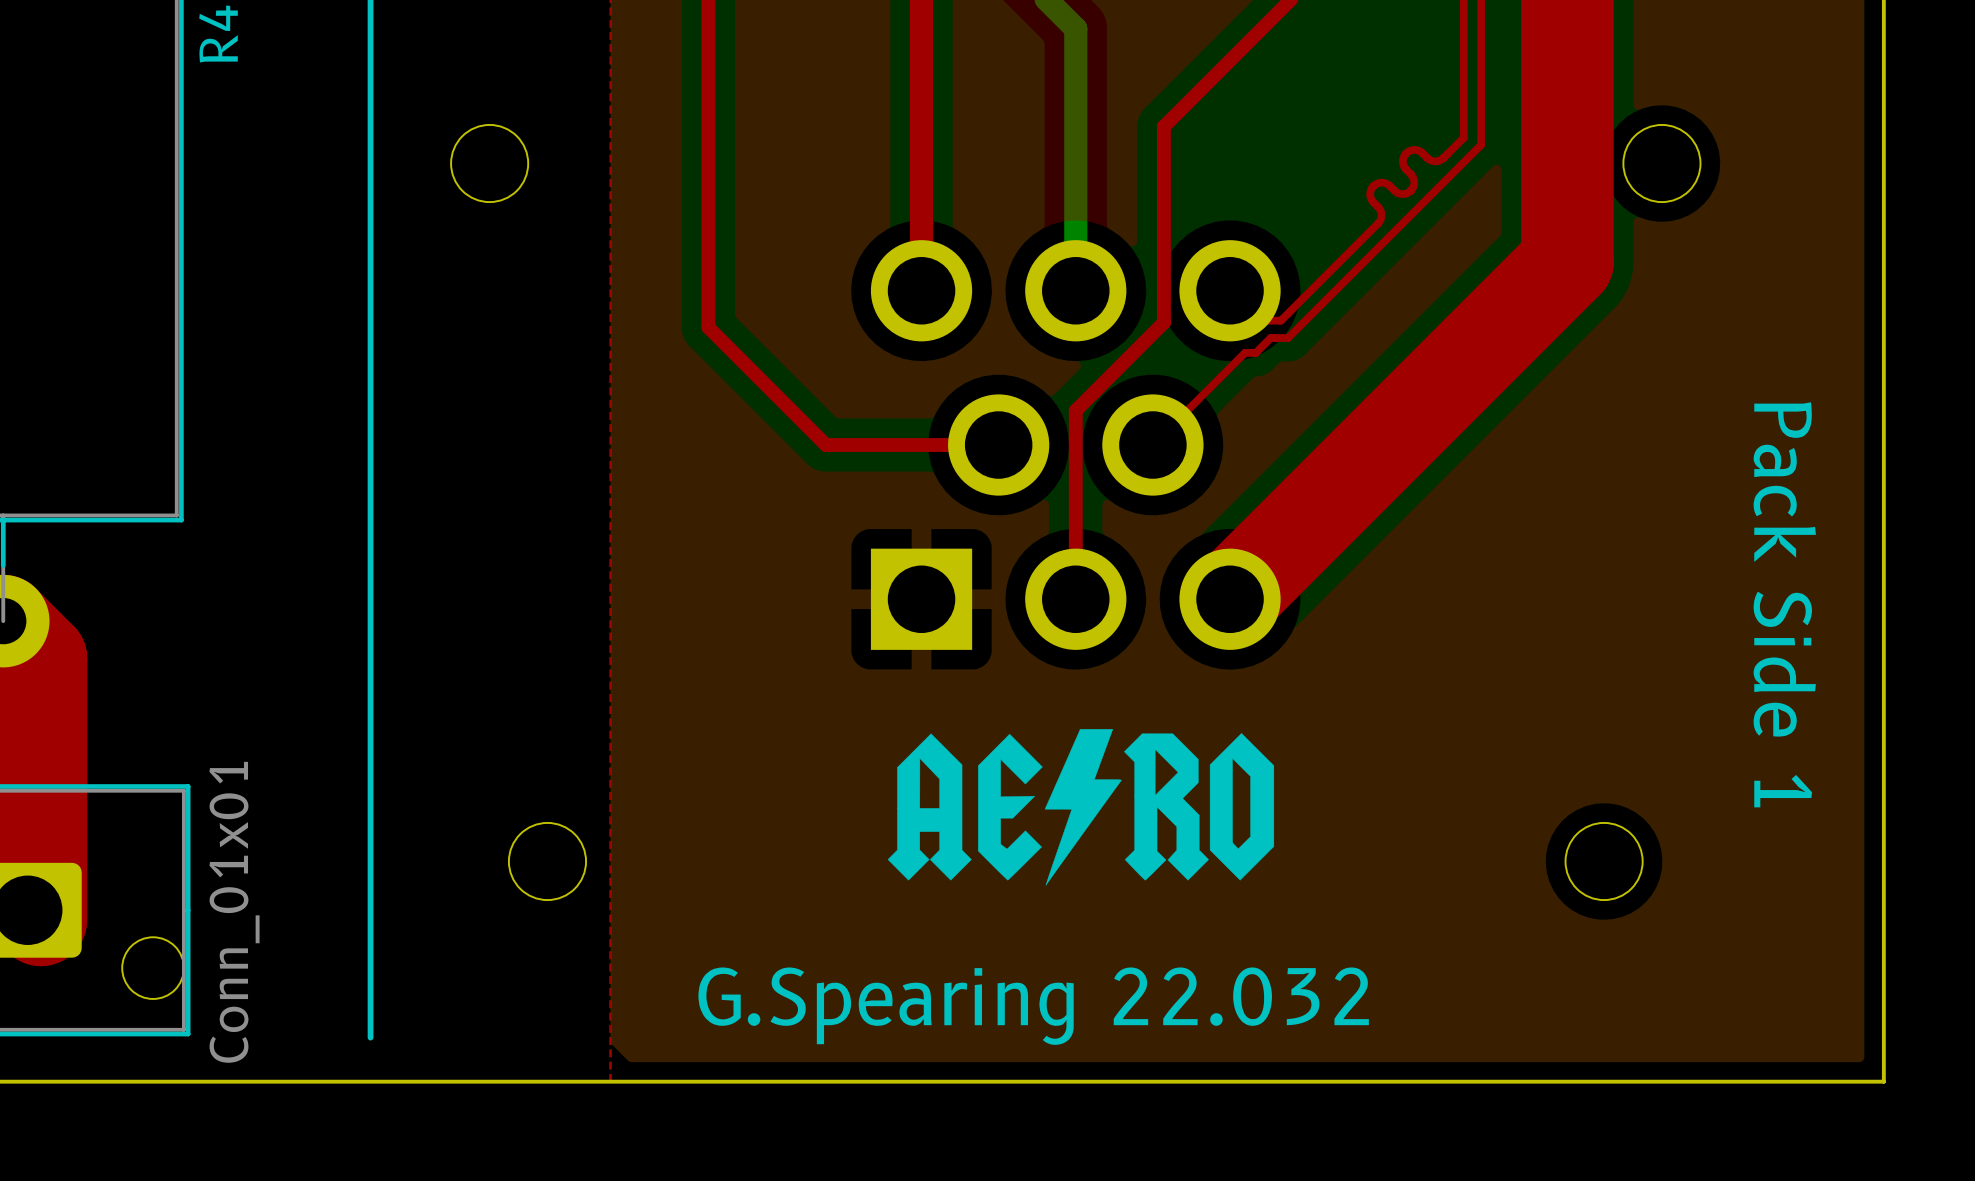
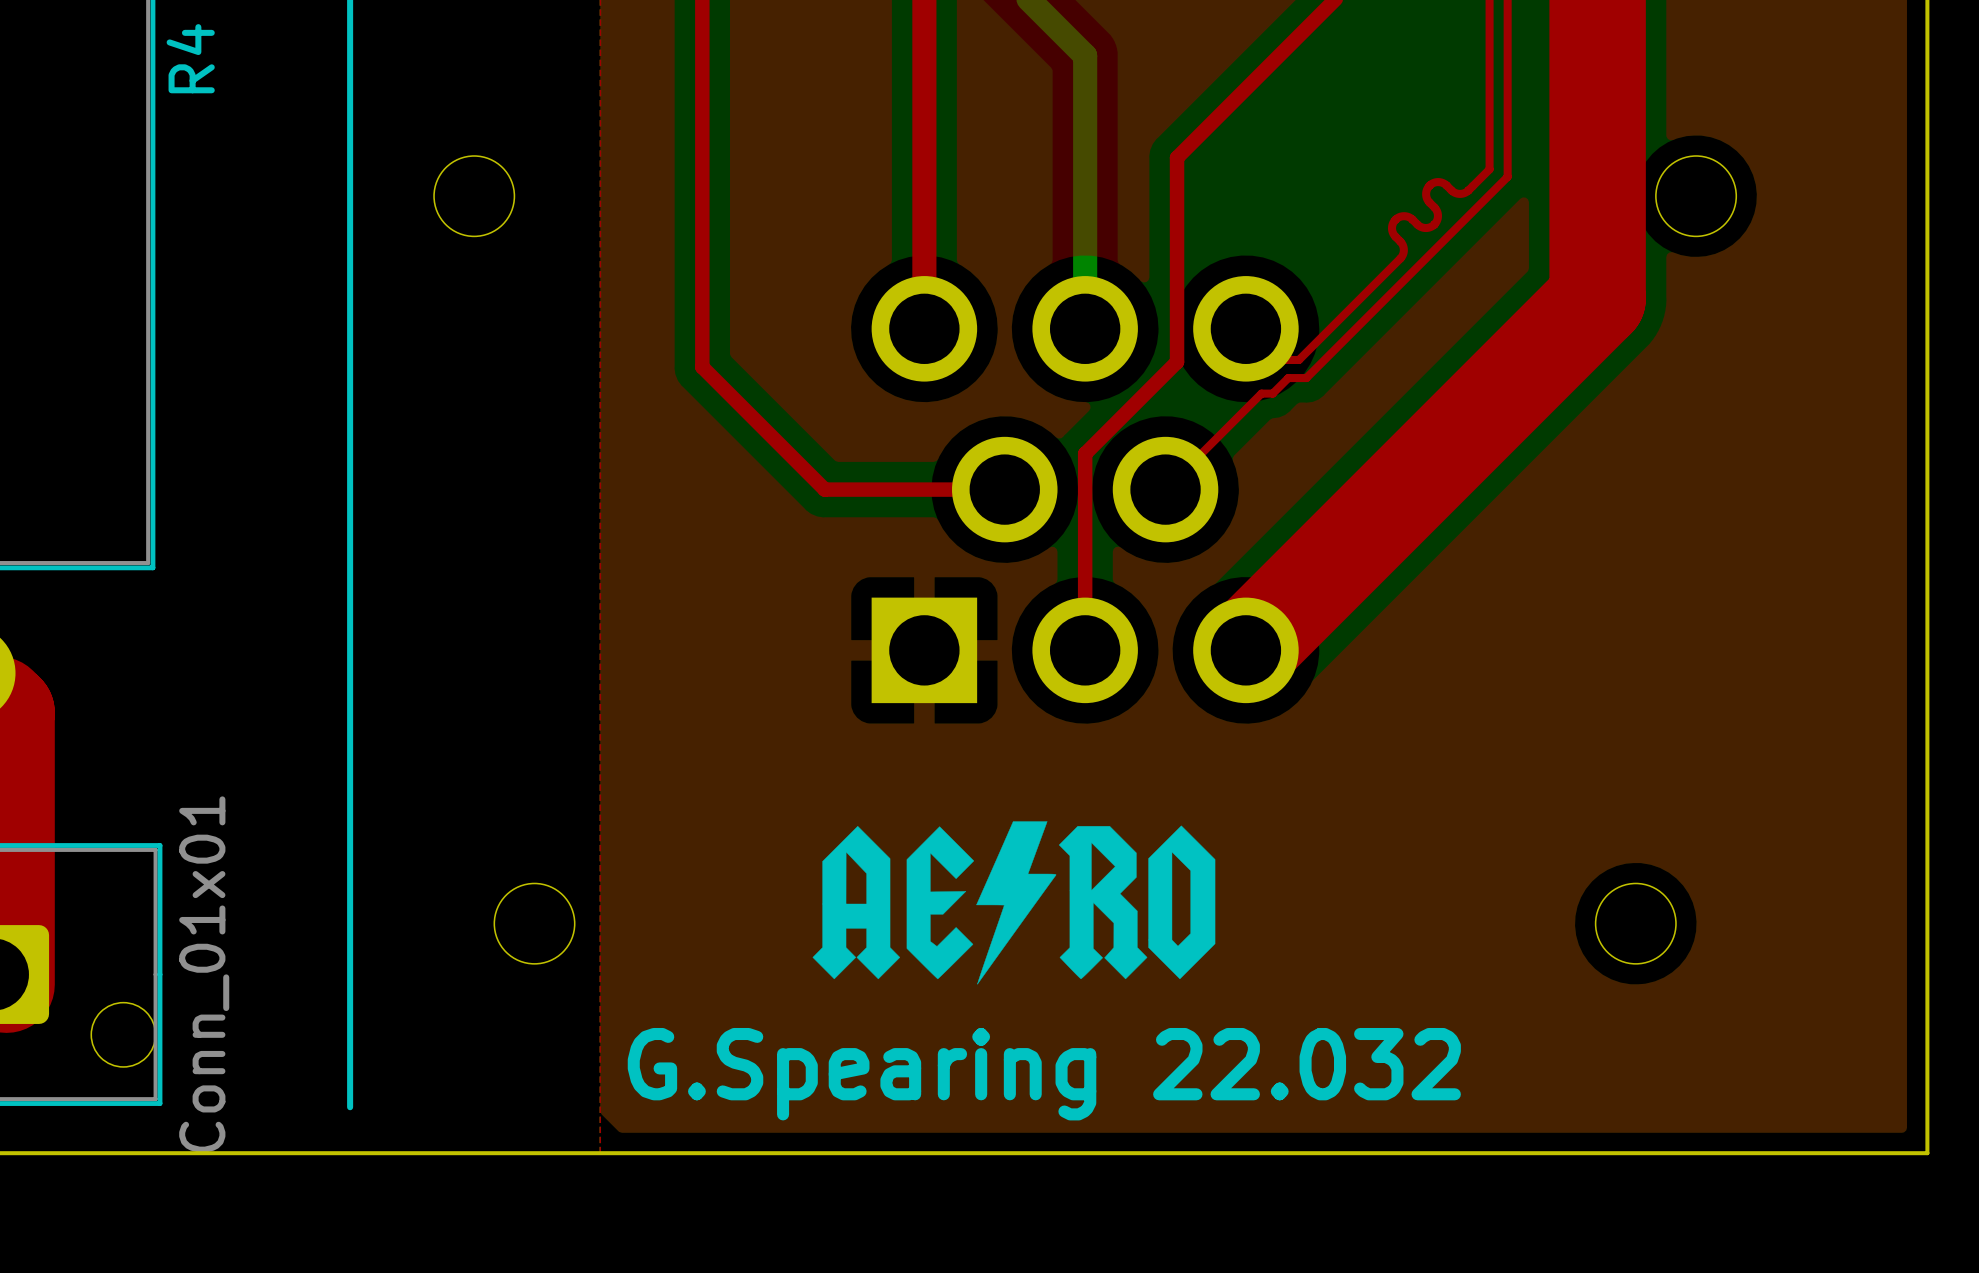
text: Pack Side 1 (1784, 604) -> none
drawing position: (1080, 807) -> (1013, 902)

